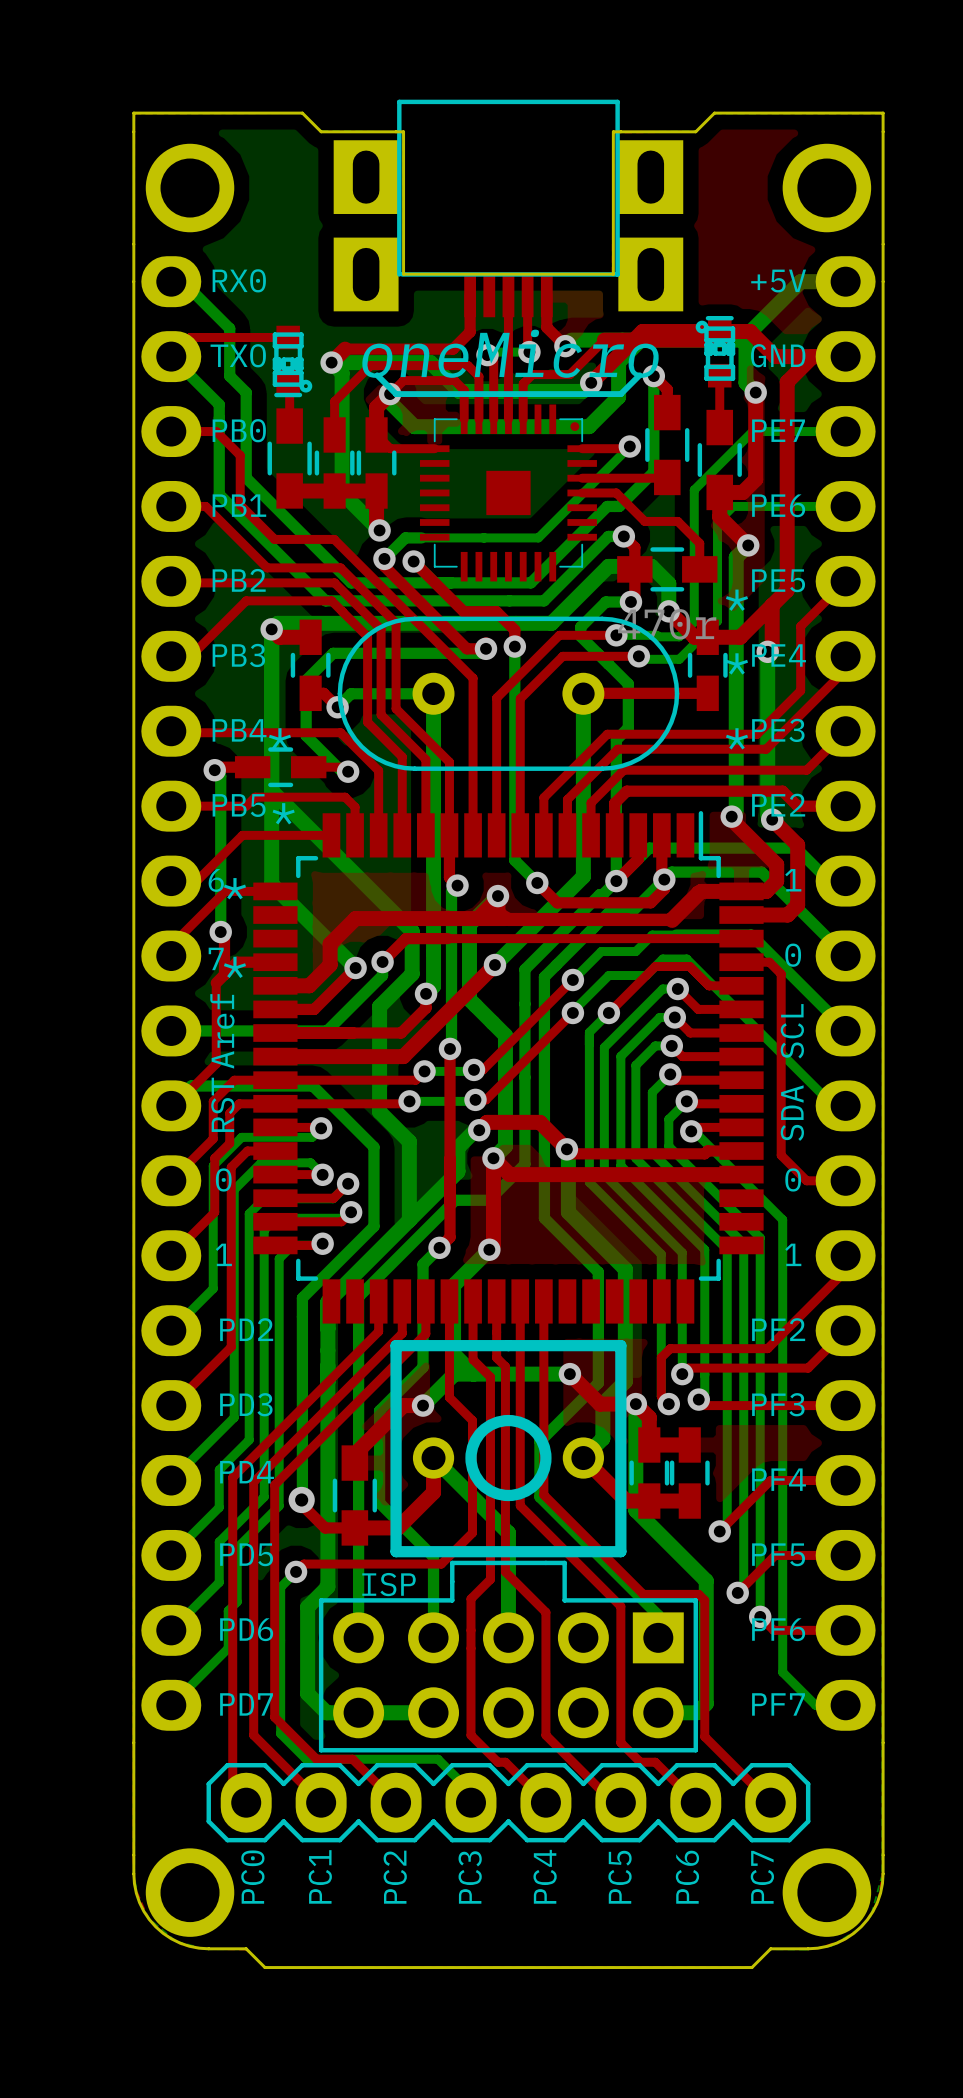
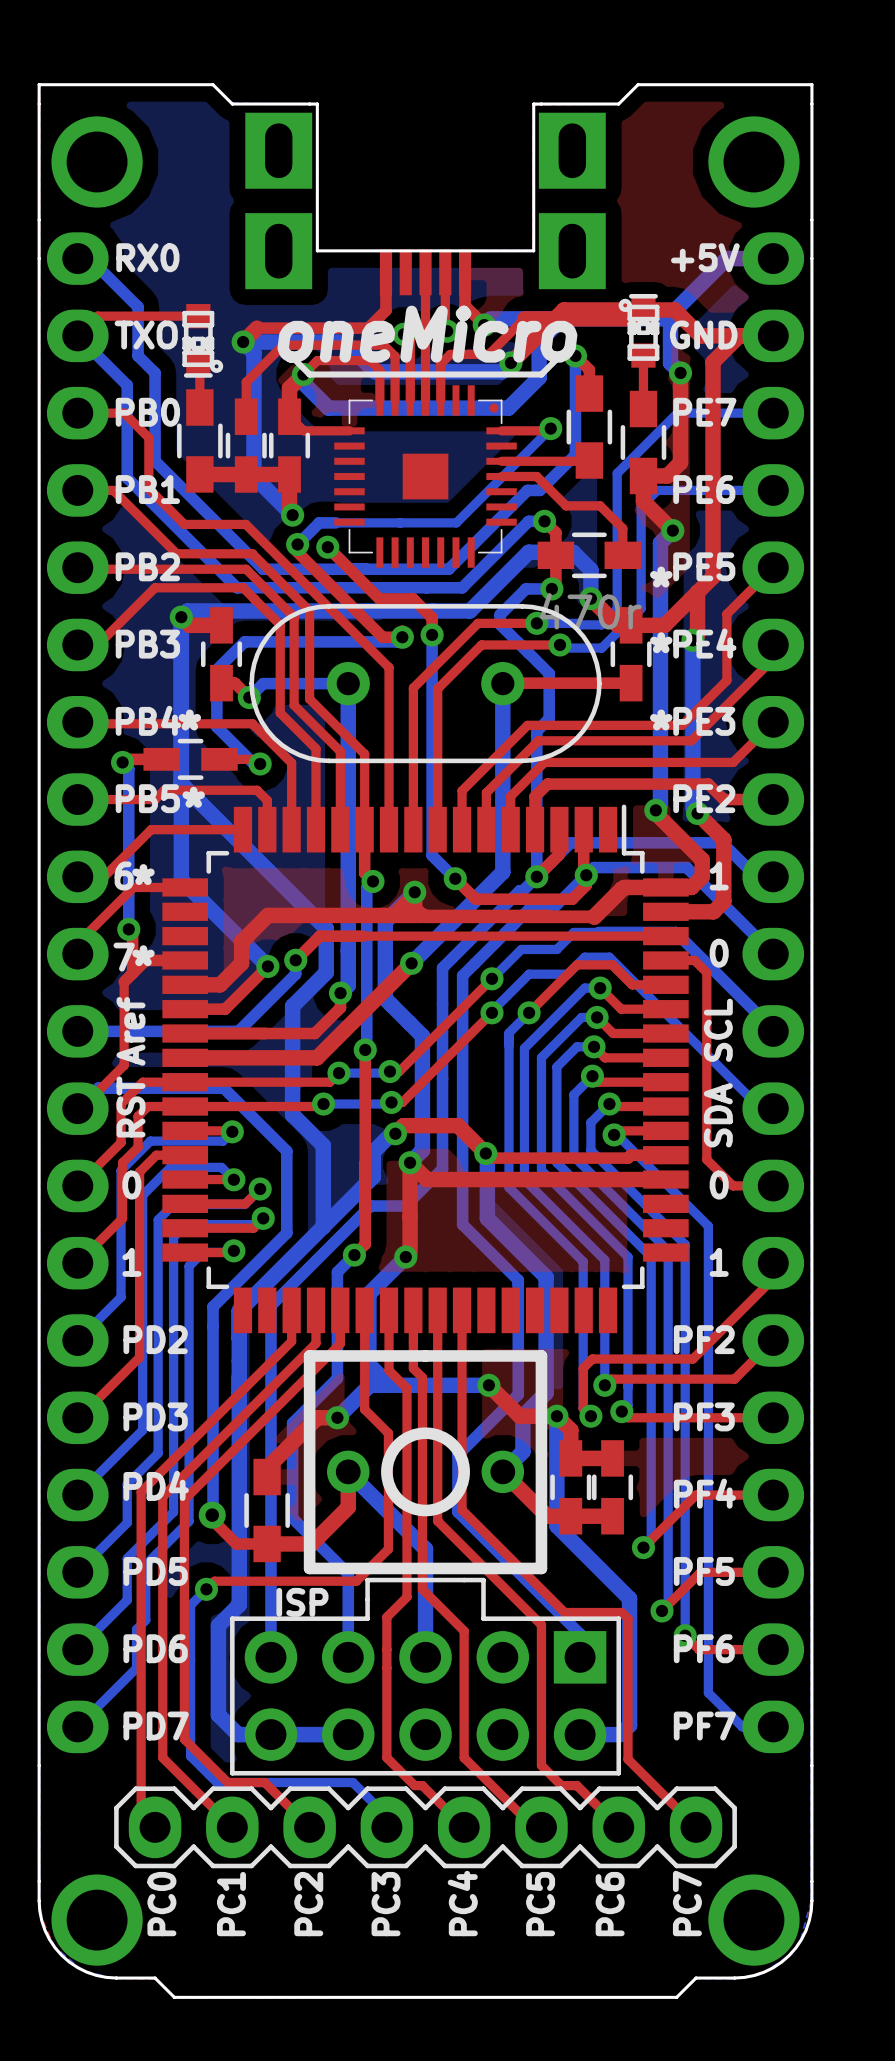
part footprint: [333, 99, 684, 318] -> [245, 112, 606, 296]

